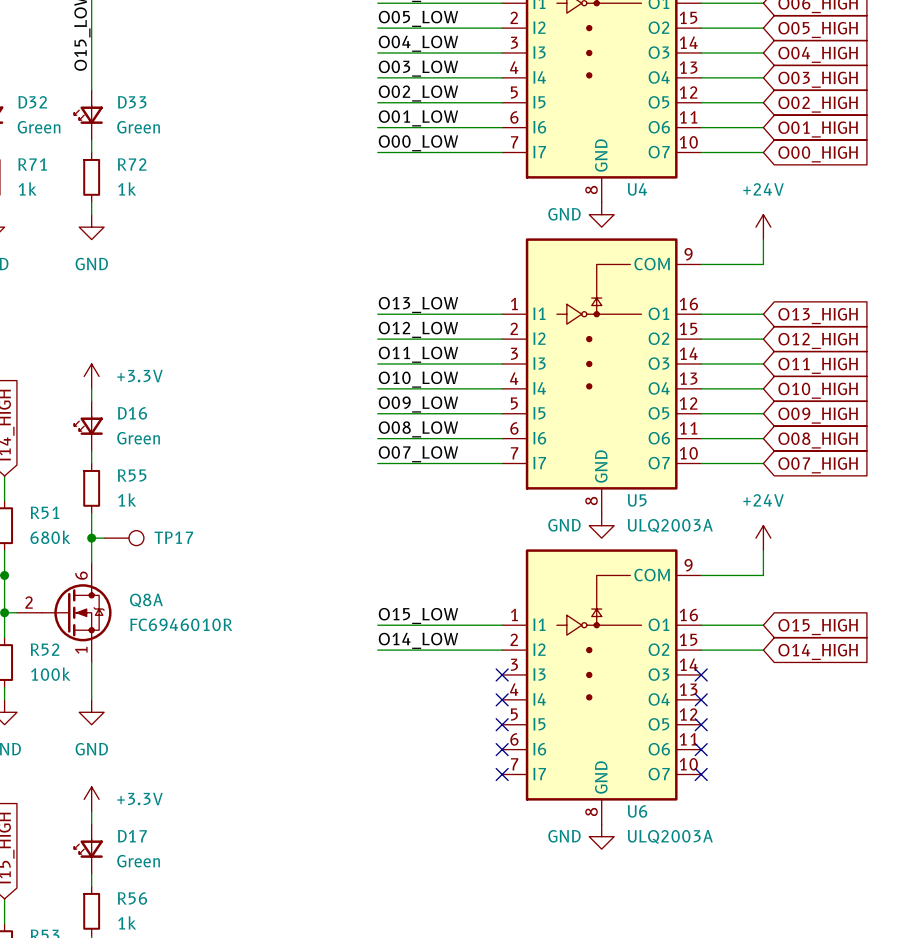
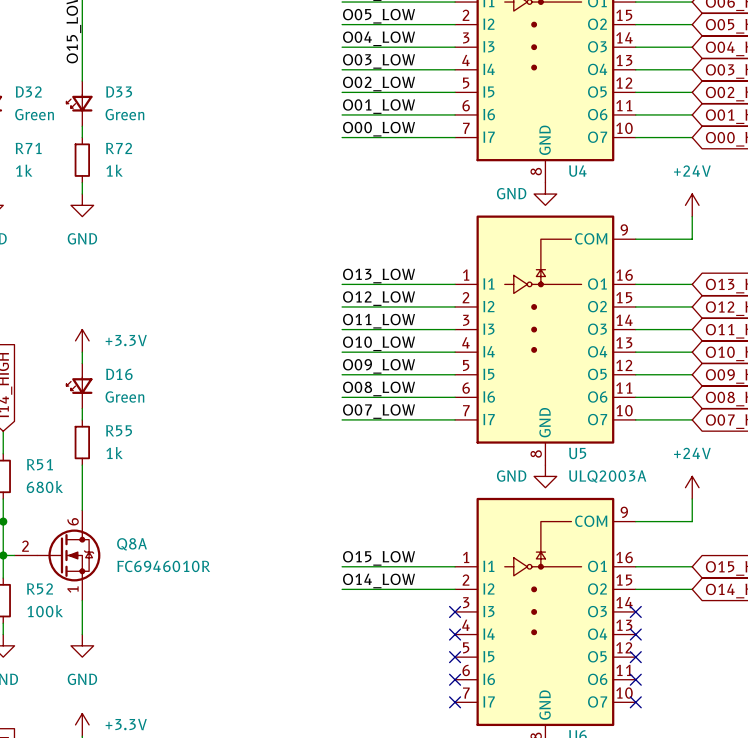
wire: (91, 538) (104, 538) -> none
junction: (91, 538) -> none
TP17: (124, 538) -> none

